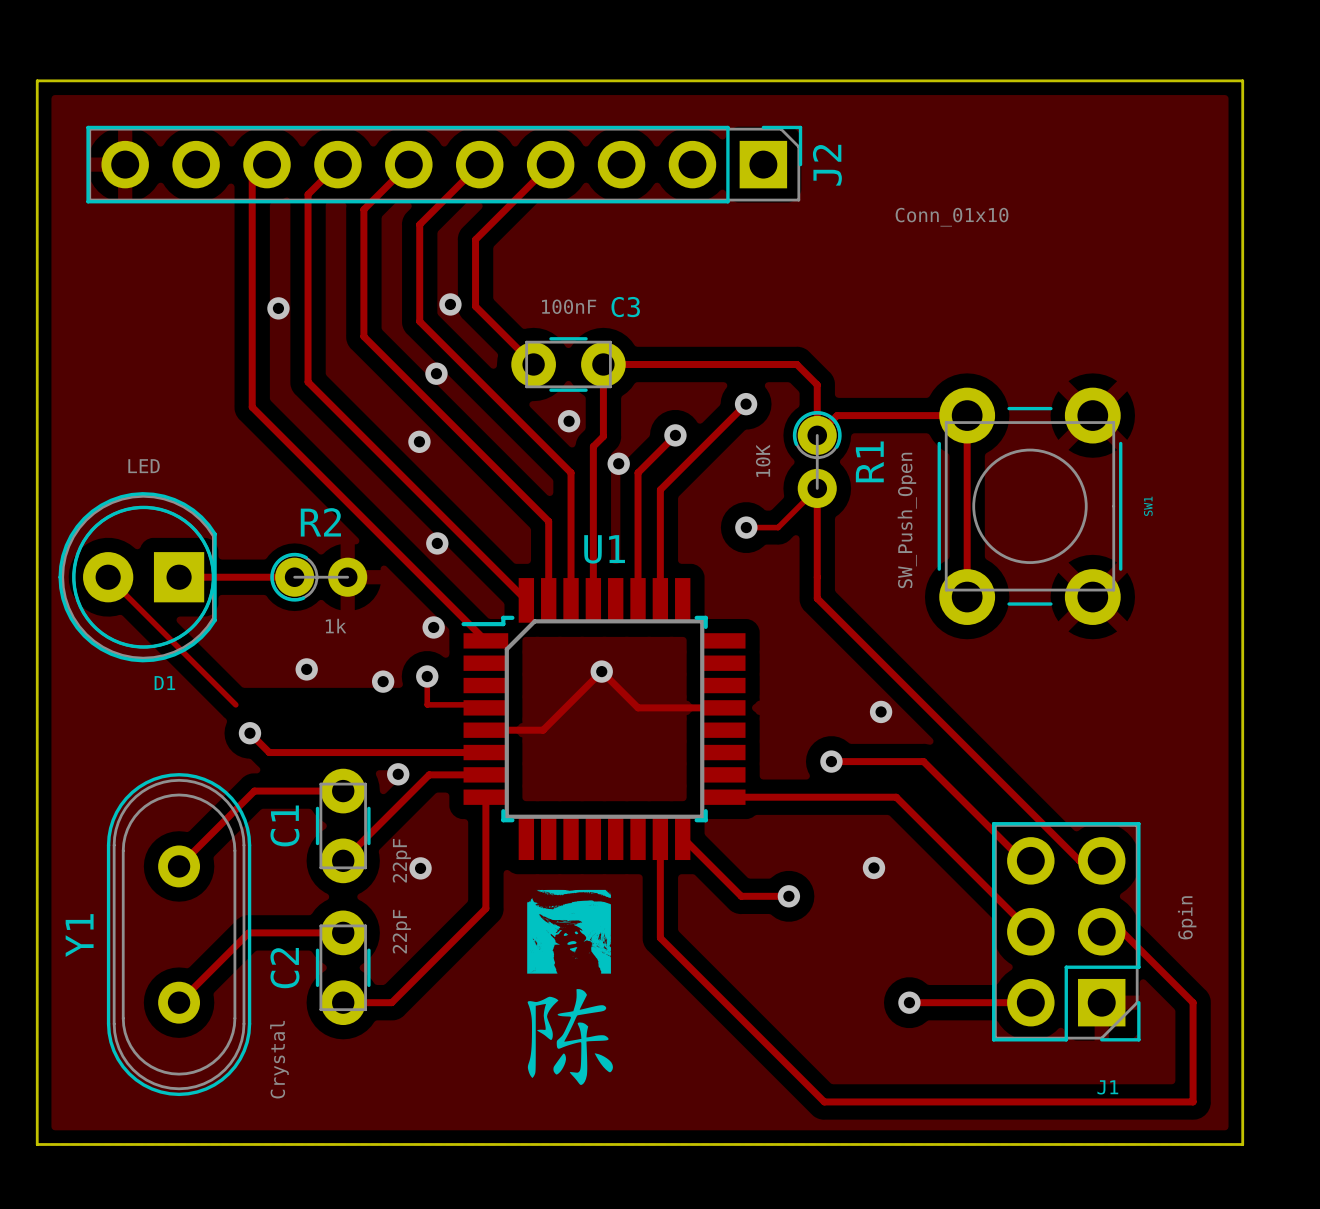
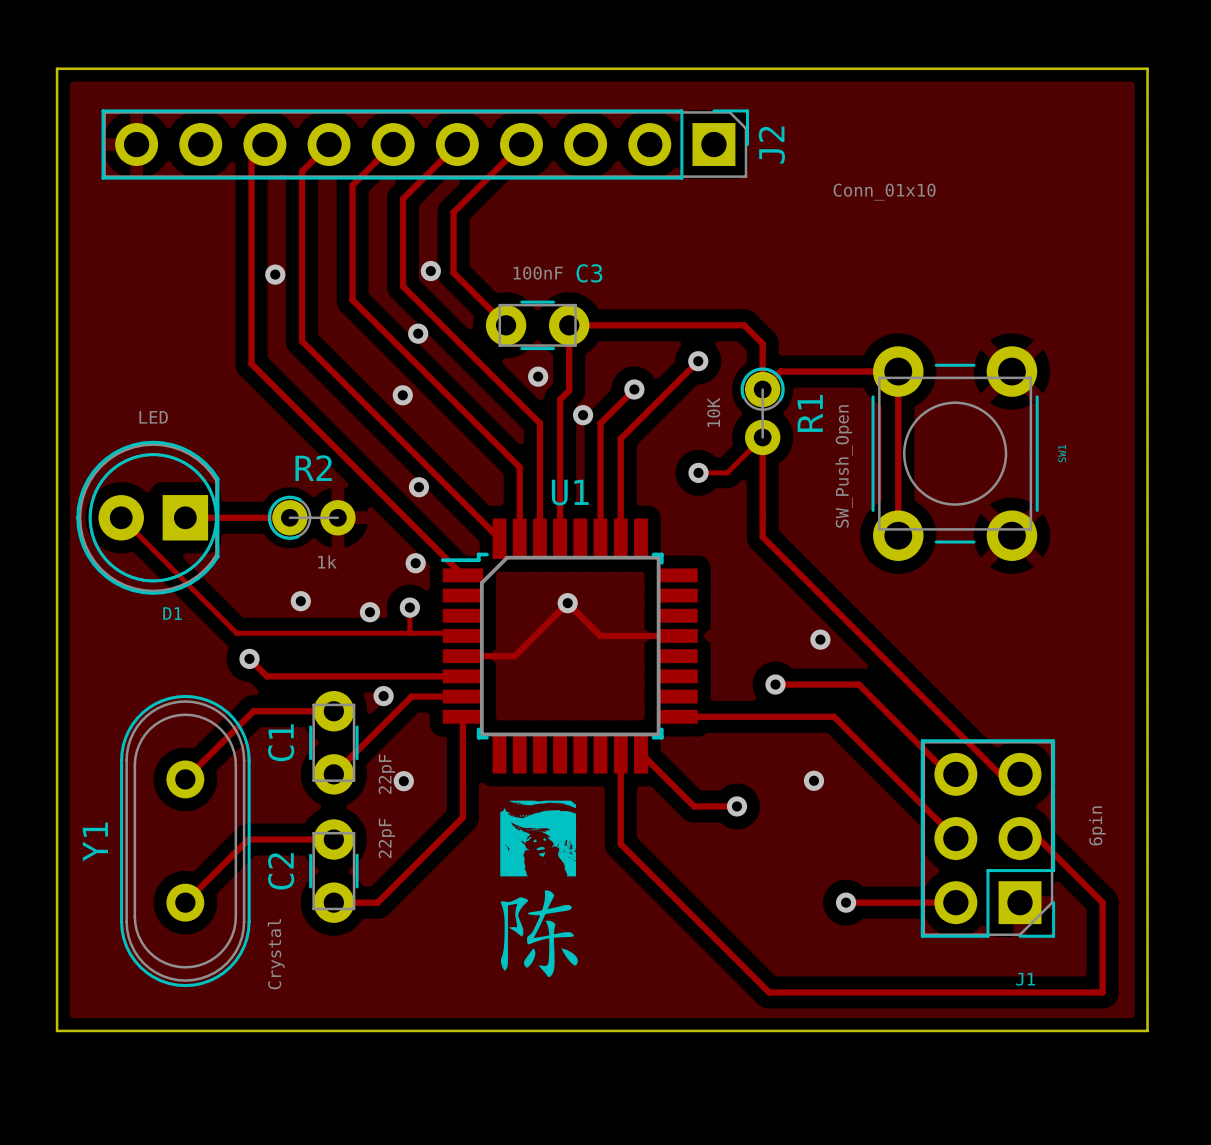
track: none -> (236, 633) (409, 633)

